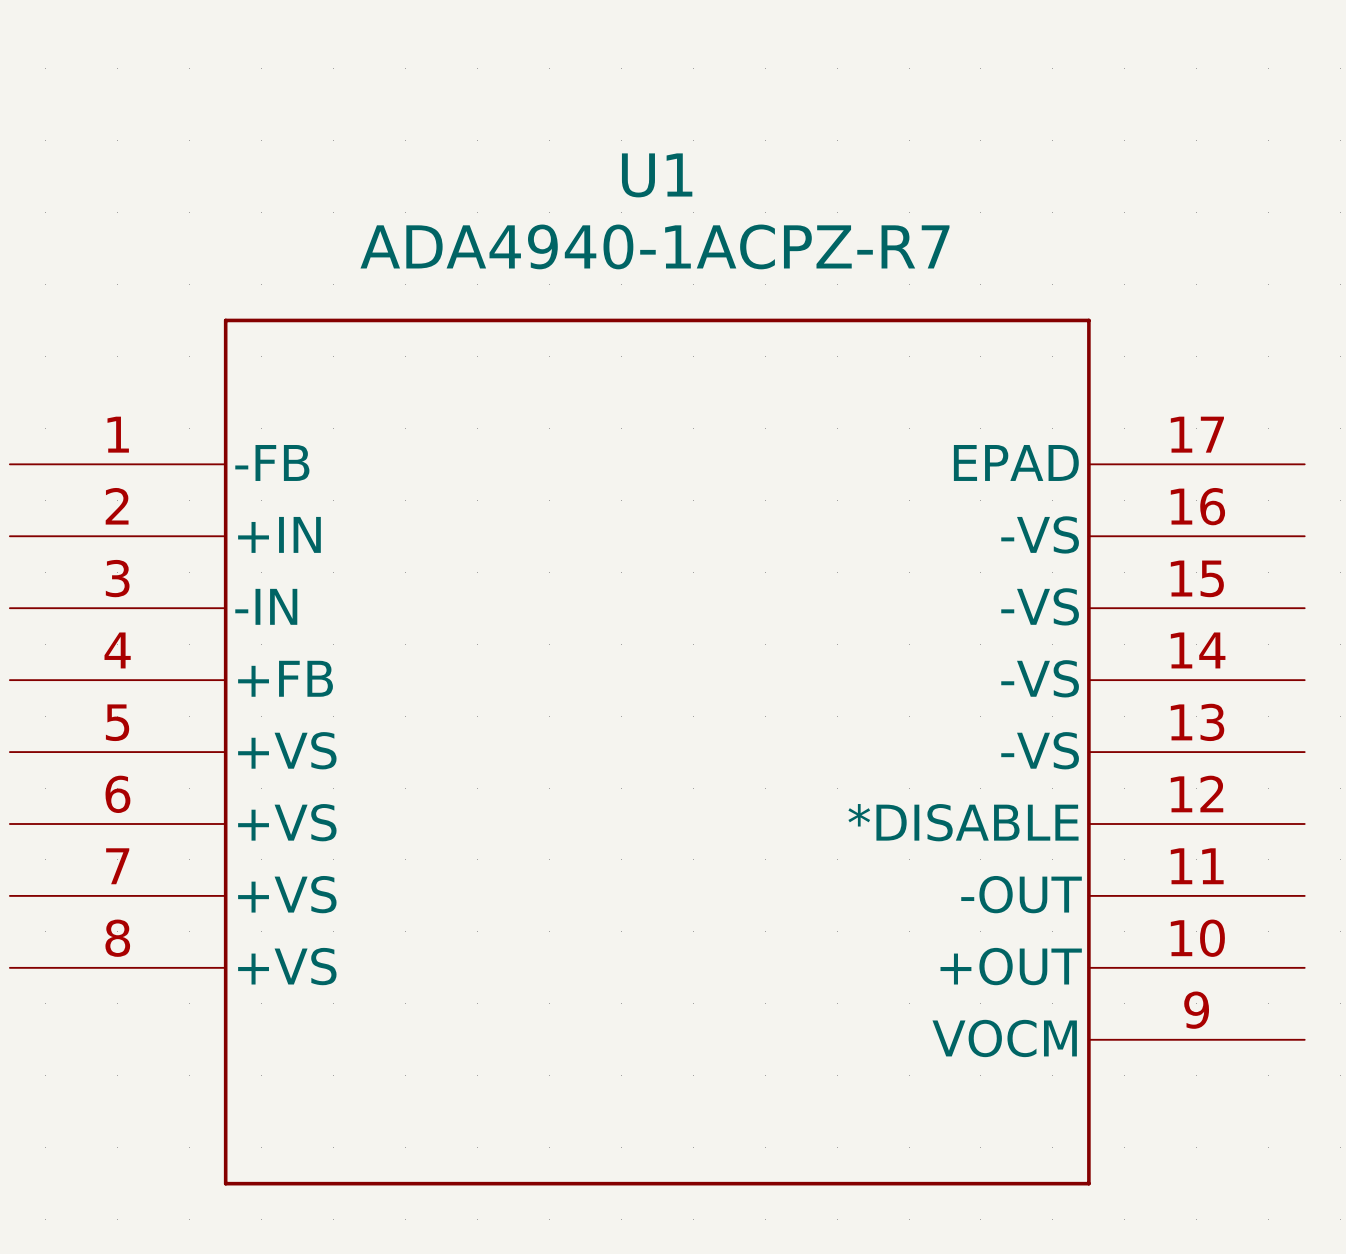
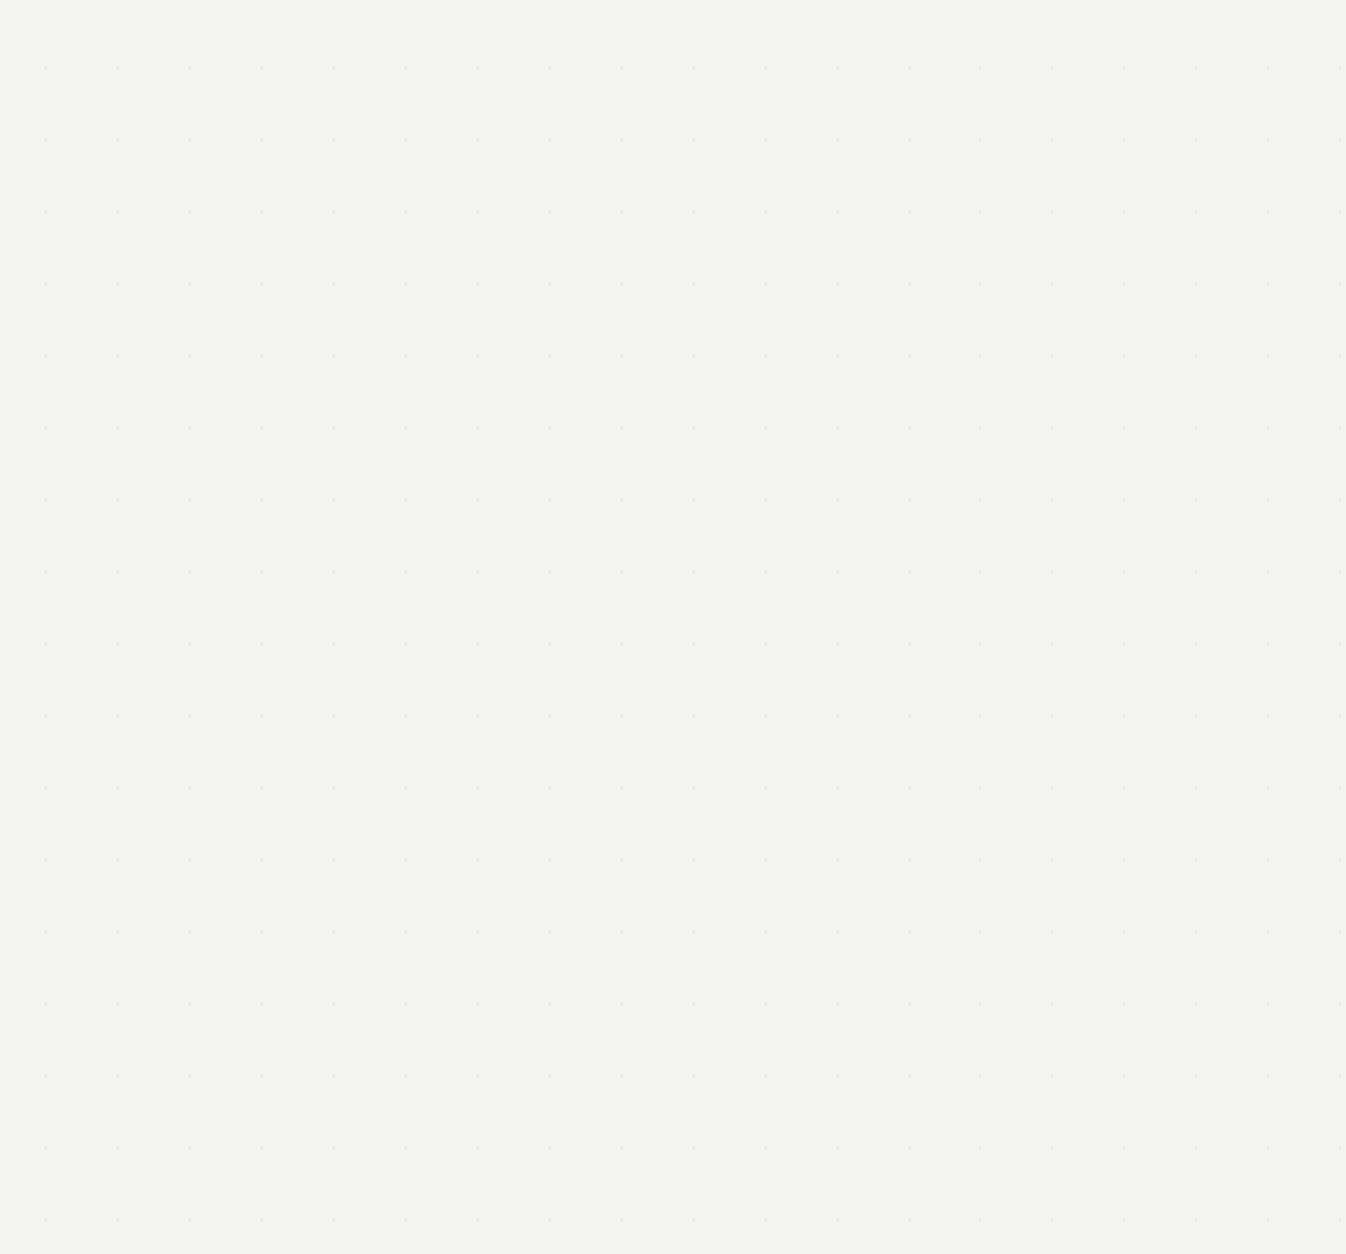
U1: ADA4940-1ACPZ-R7 (657, 752) -> none

